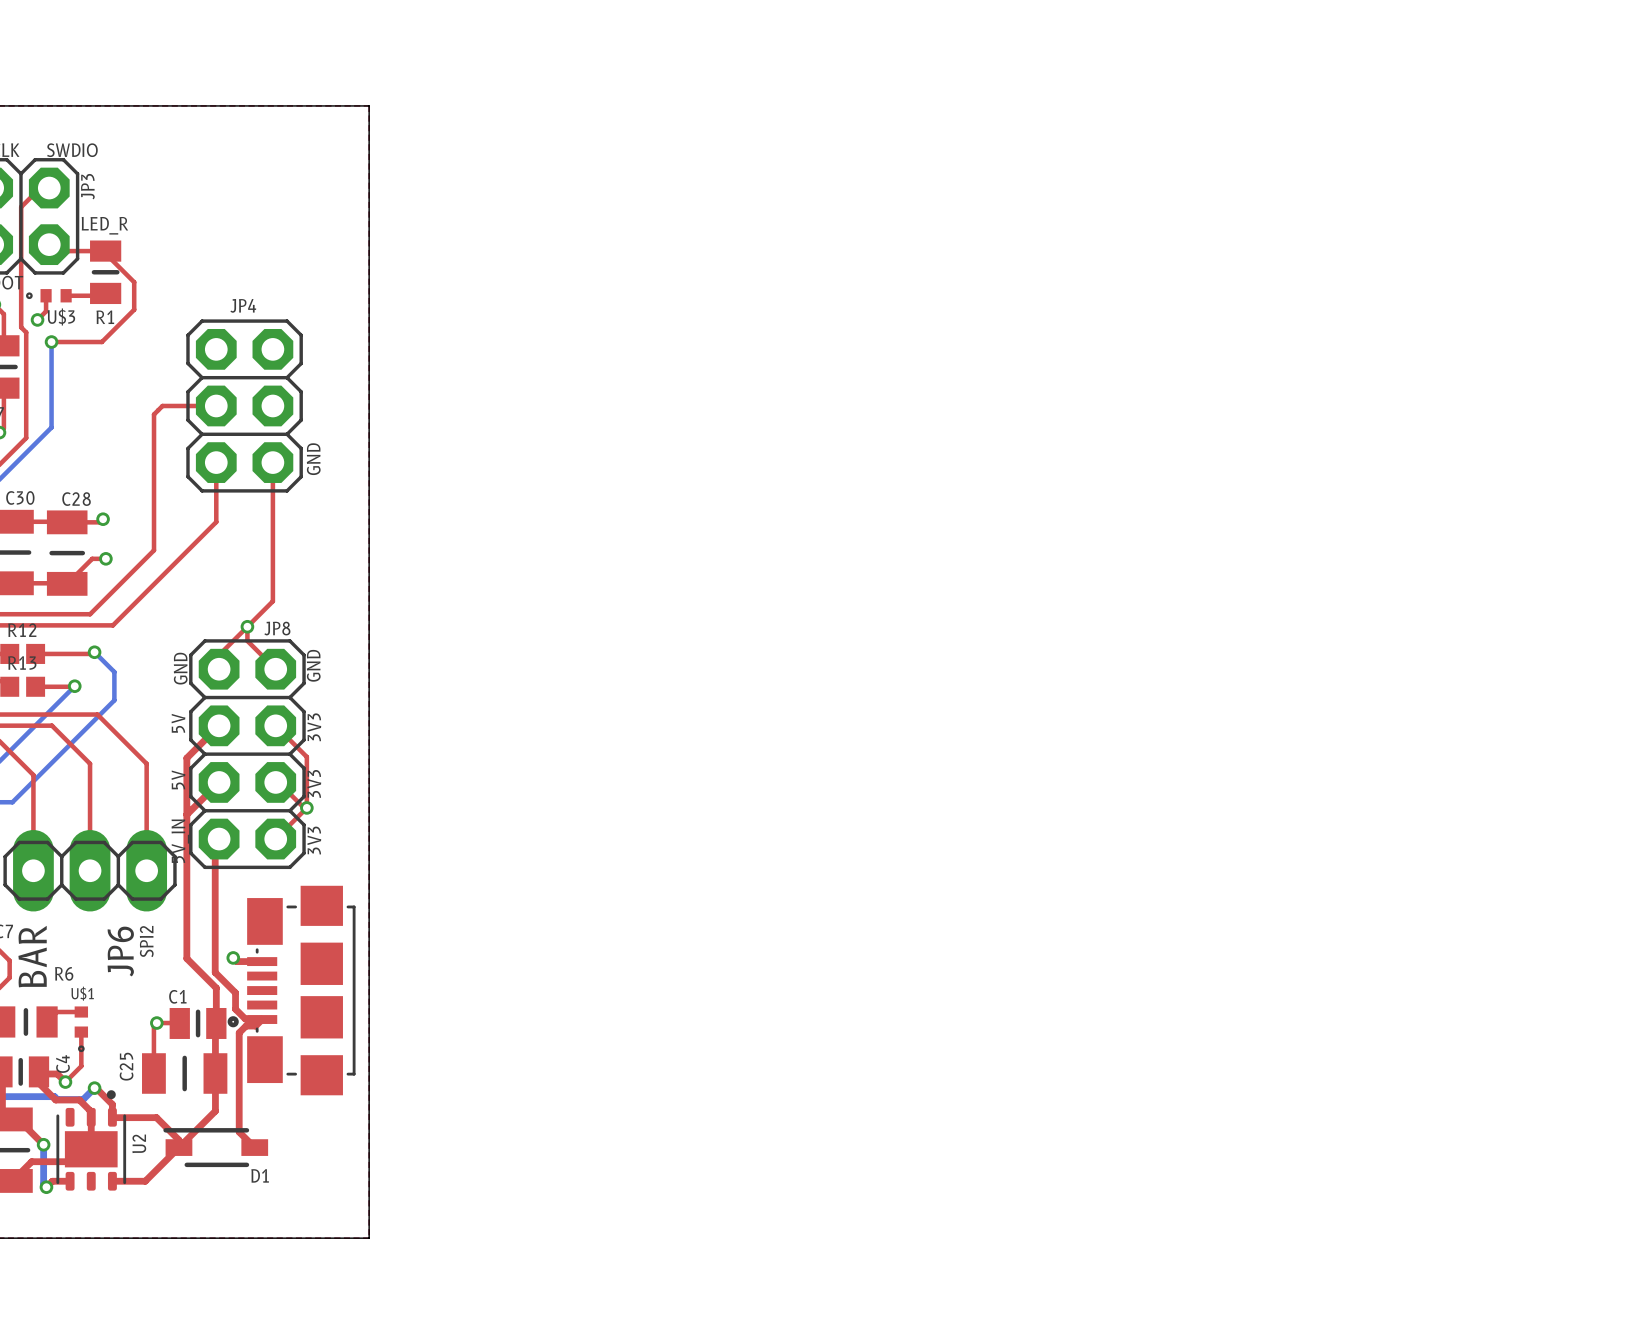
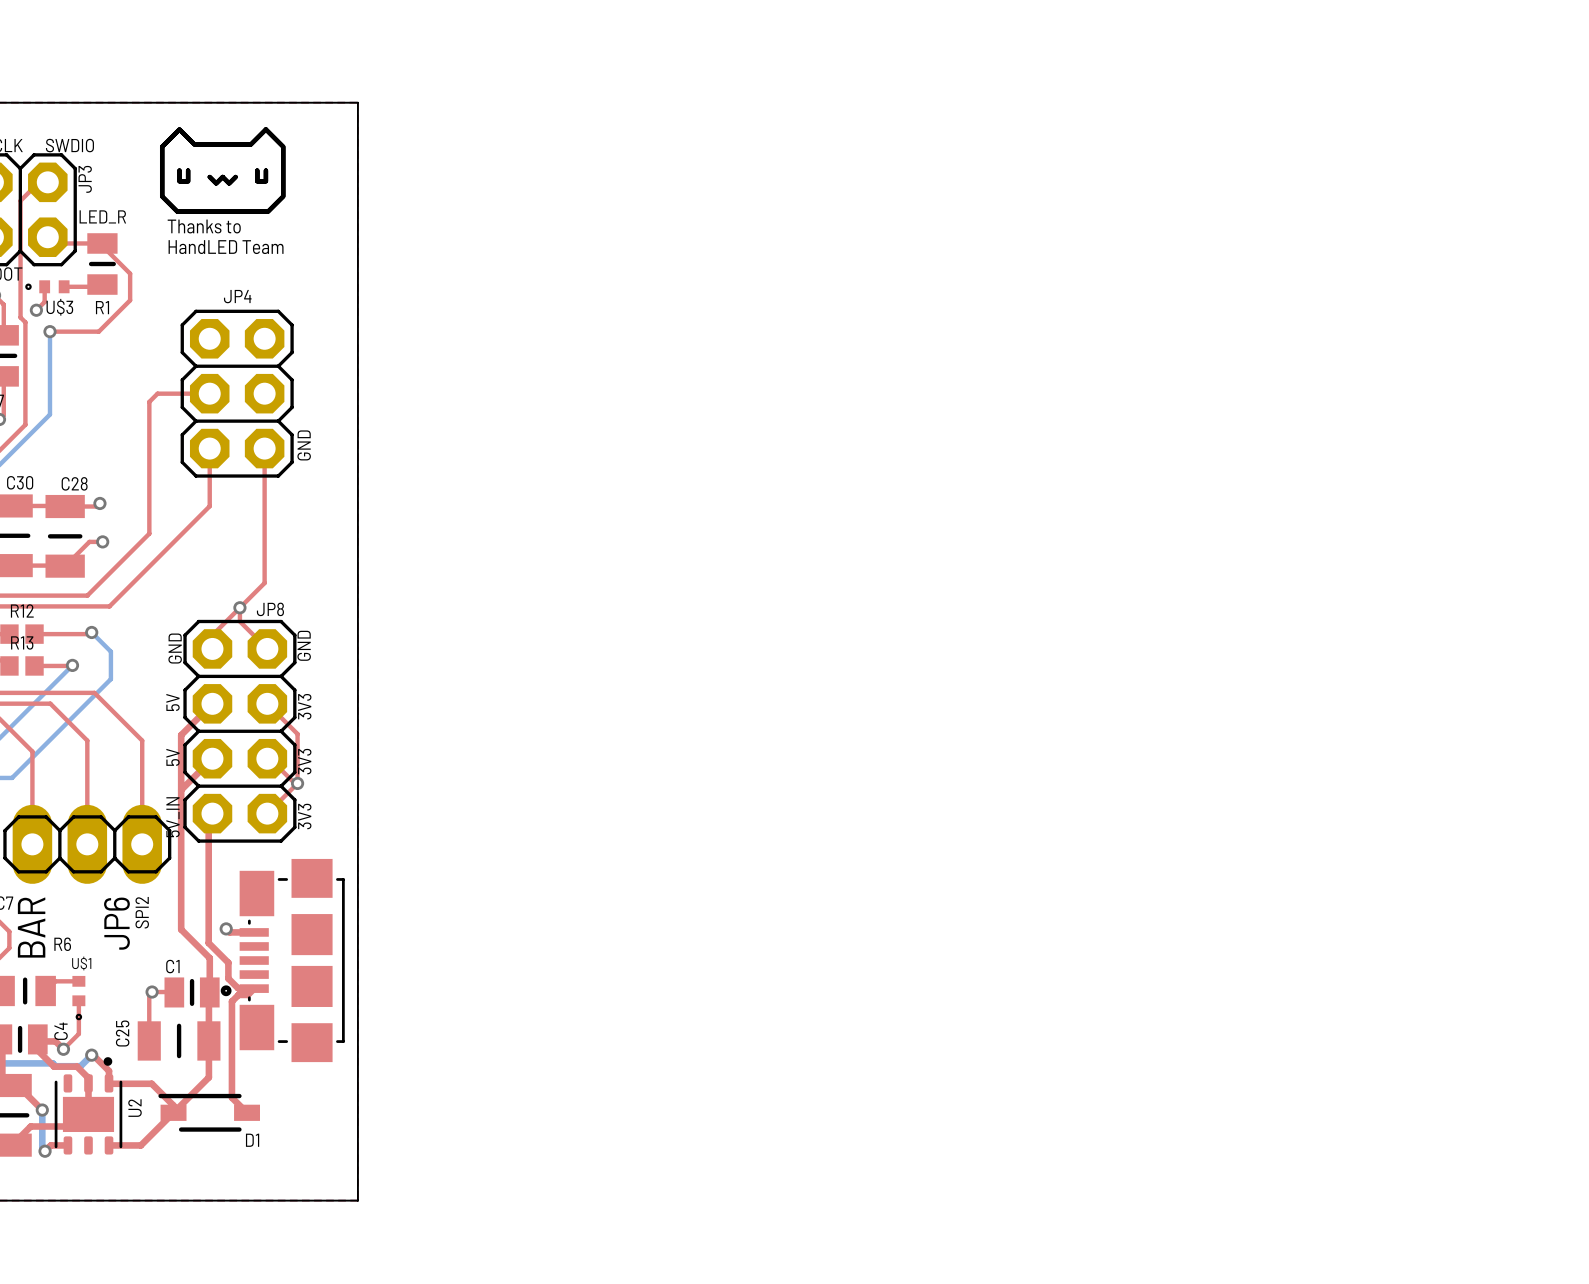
drawing: none -> [159, 127, 286, 214]
text: none -> Thanks to (204, 226)
text: none -> HandLED Team (226, 247)

